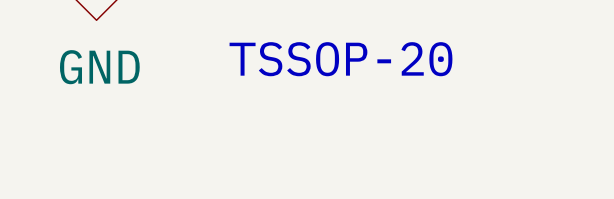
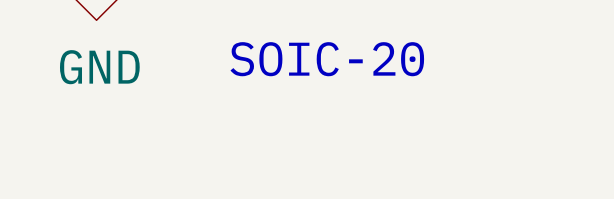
text: TSSOP-20 (341, 59) -> SOIC-20 (327, 59)

